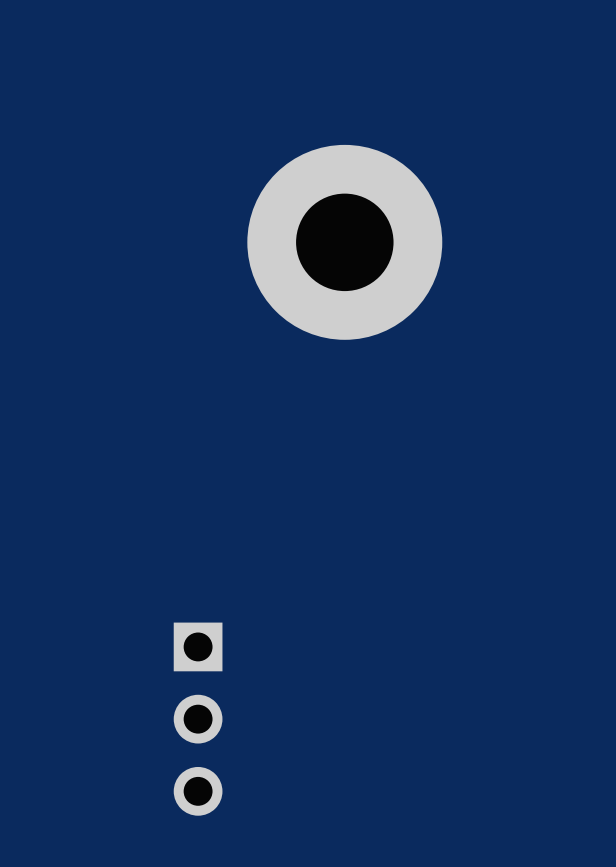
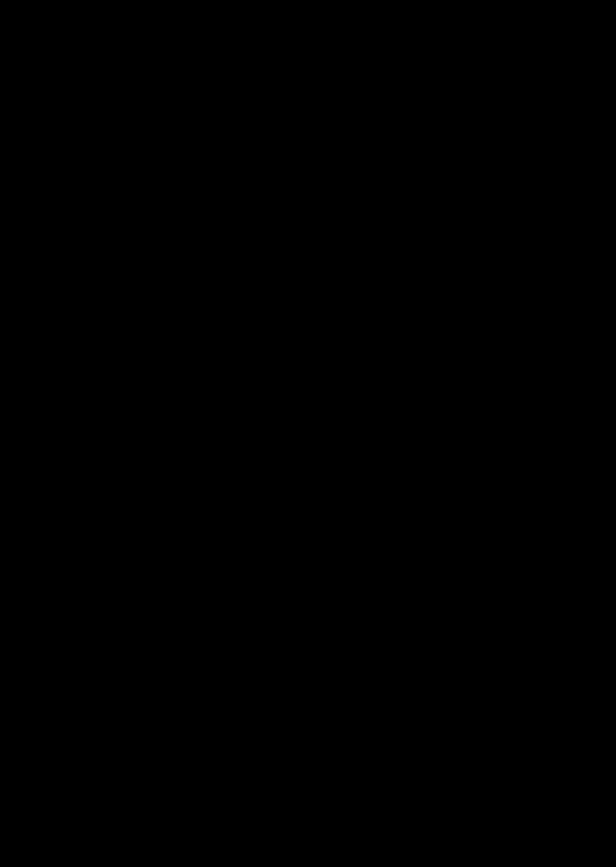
part: (344, 242) -> none
part: (198, 719) -> none

